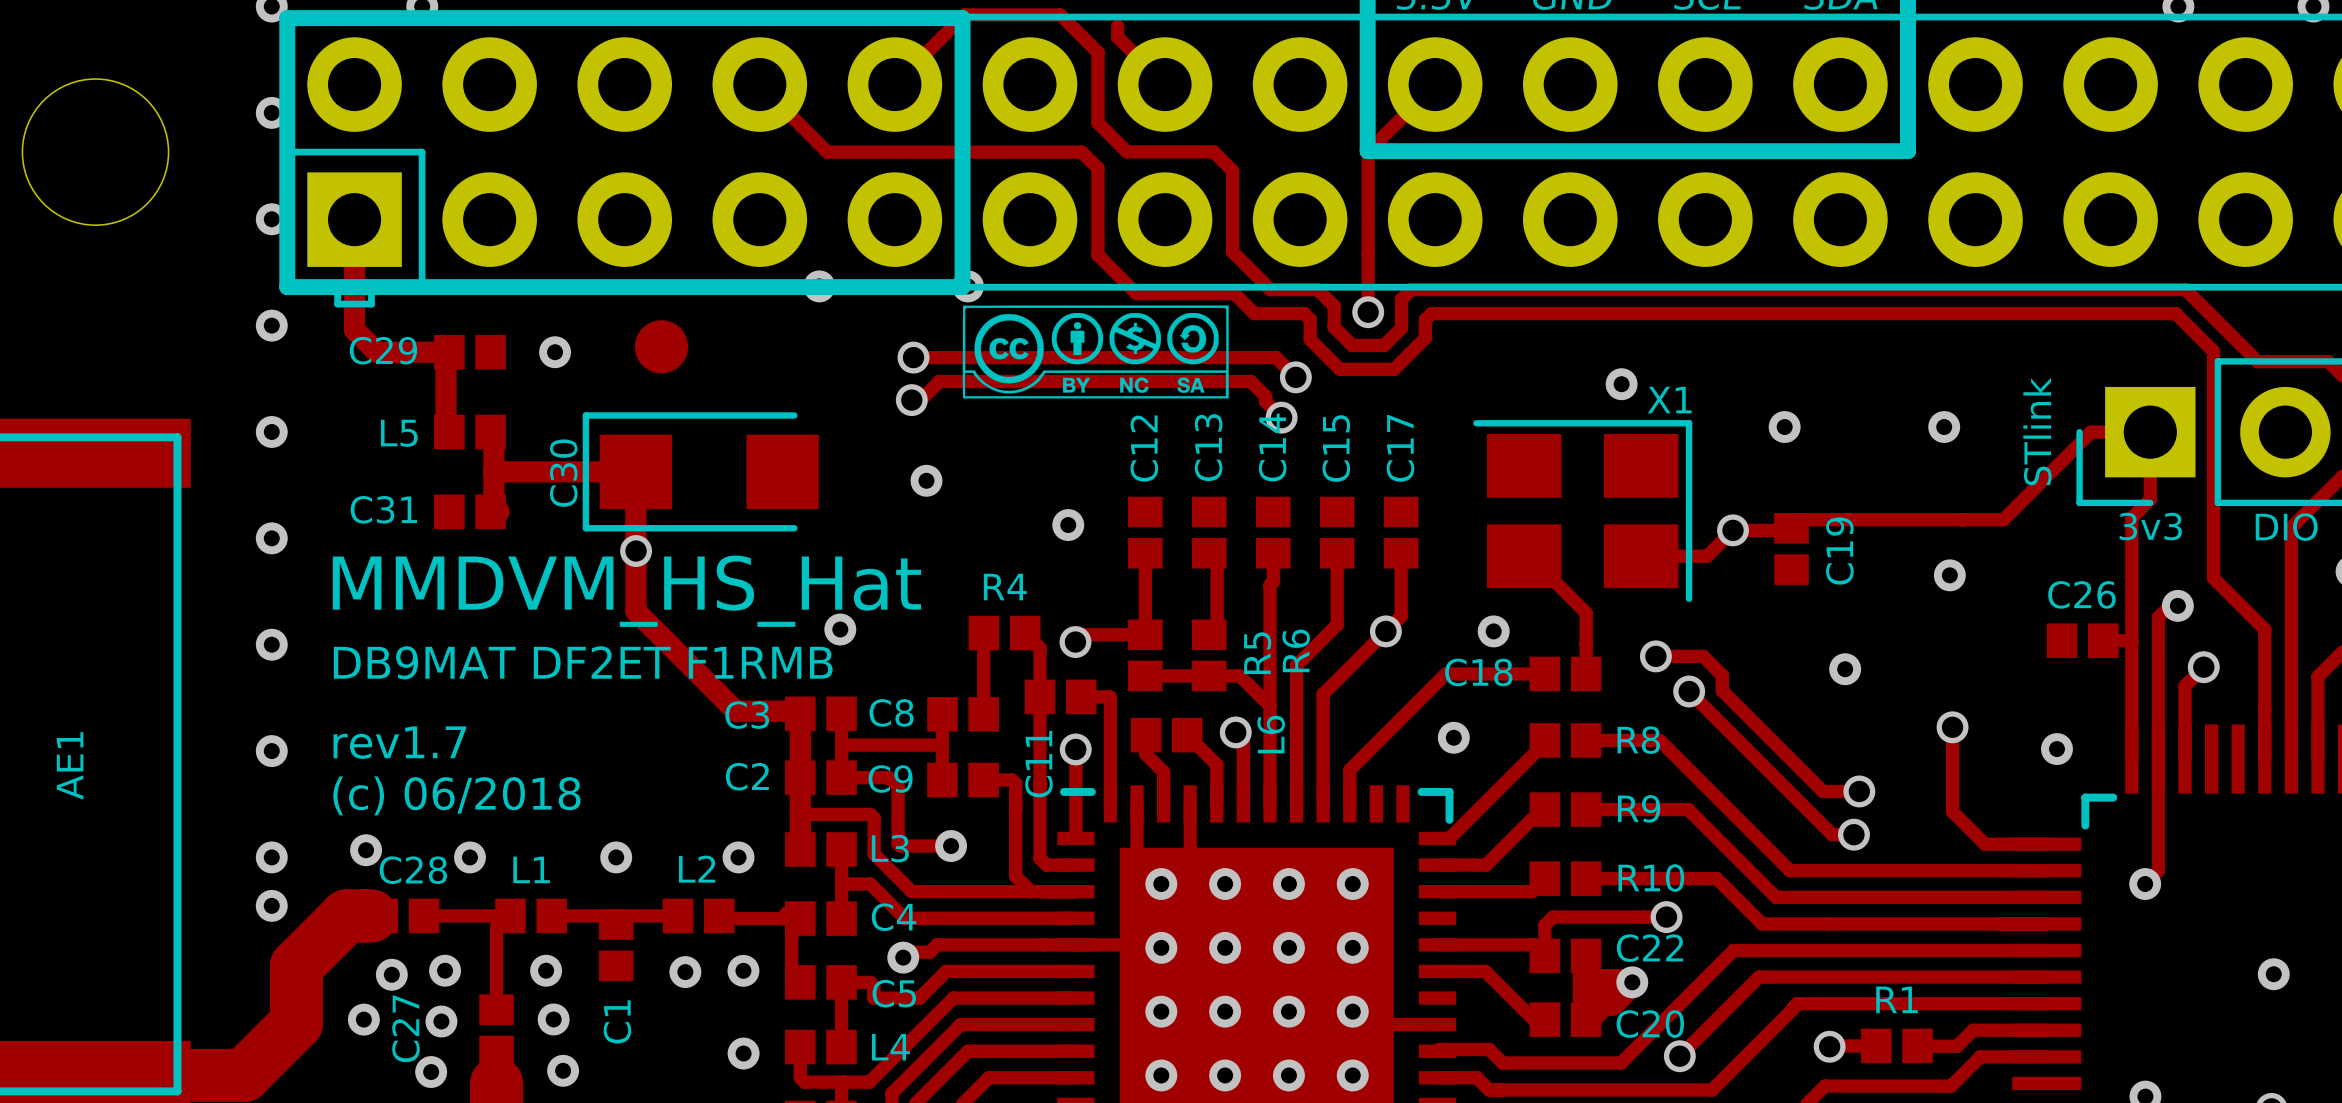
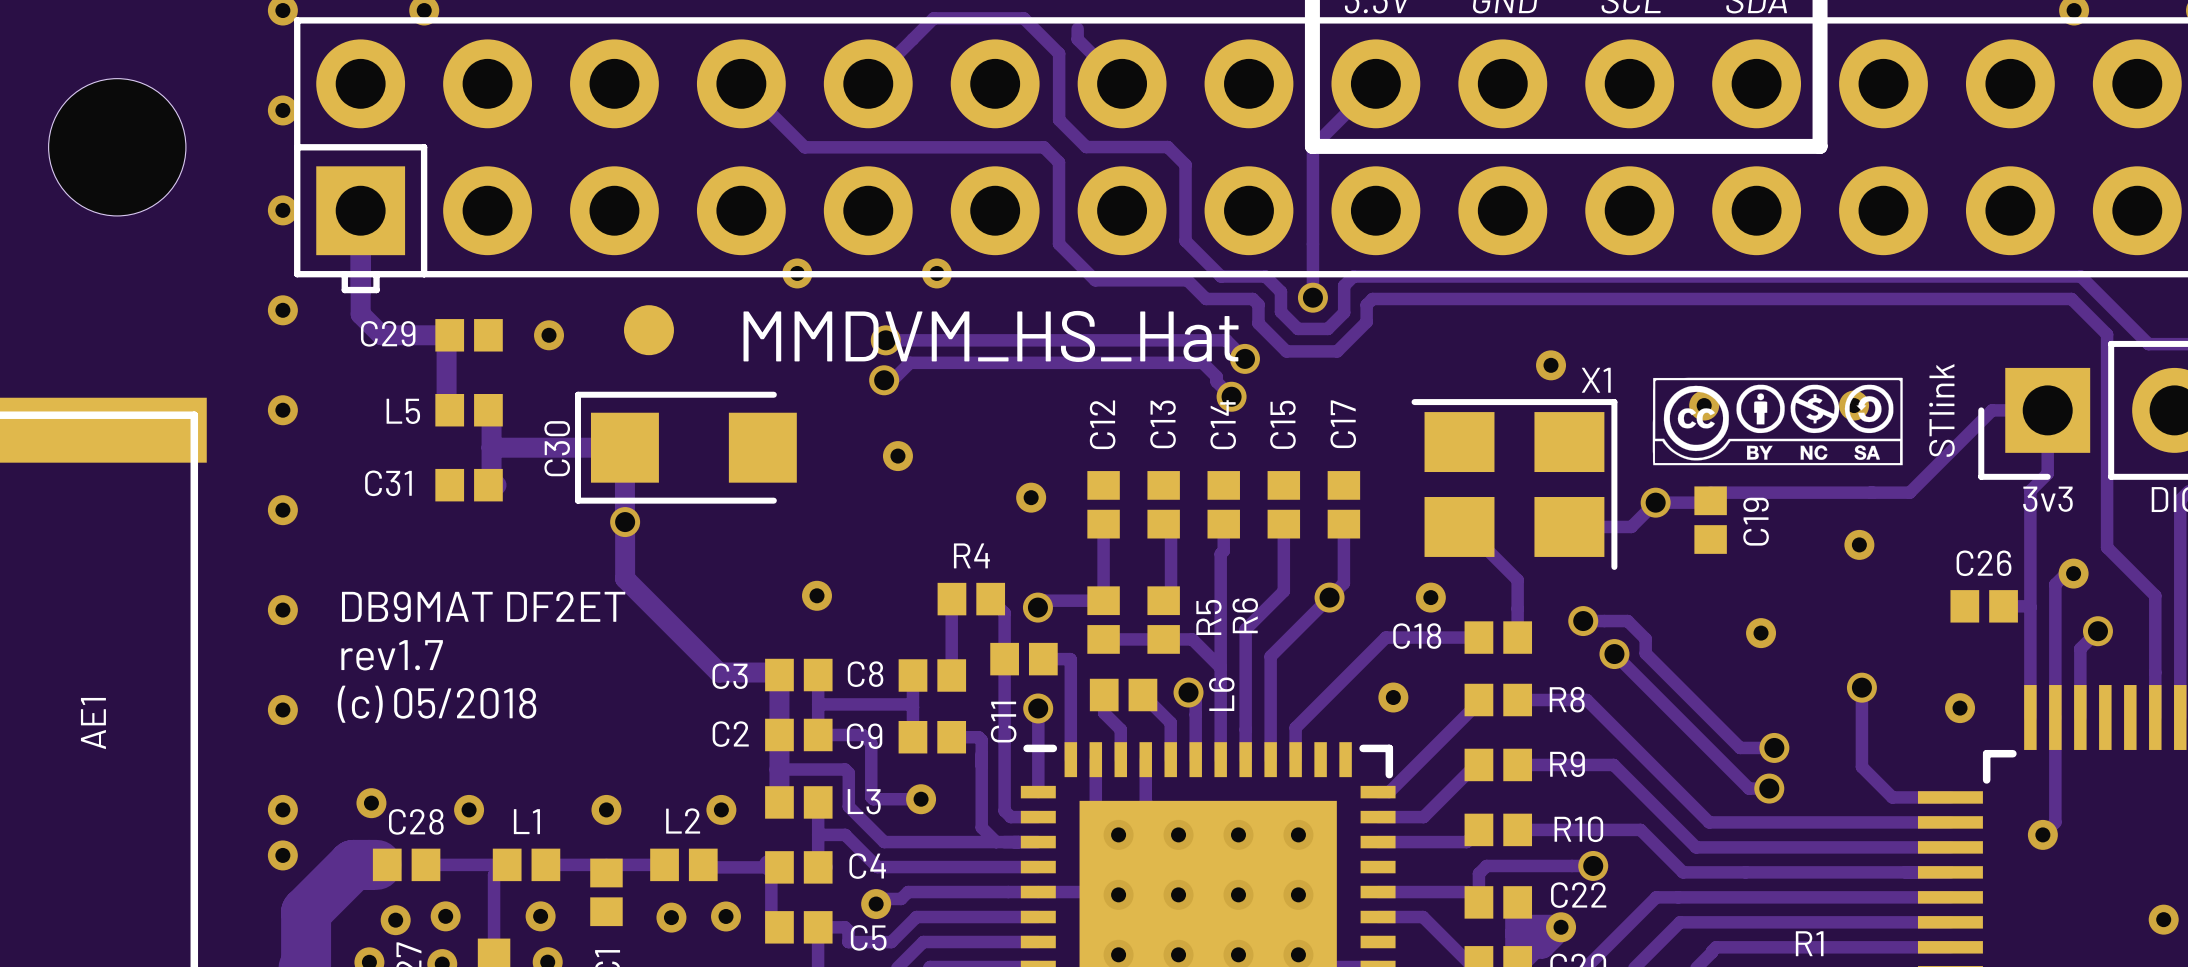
line: (287, 18) (287, 287) (962, 287) (962, 18) (287, 18) -> none
drawing position: (1095, 351) -> (1777, 421)
text position: MMDVM_HS_Hat (626, 591) -> MMDVM_HS_Hat (991, 336)
text: DB9MAT DF2ET F1RMB (583, 662) -> DB9MAT DF2ET (483, 606)
text position: rev1.7 (399, 742) -> rev1.7 (392, 655)
text: (c) 06/2018 (456, 795) -> (c) 05/2018 (437, 704)

